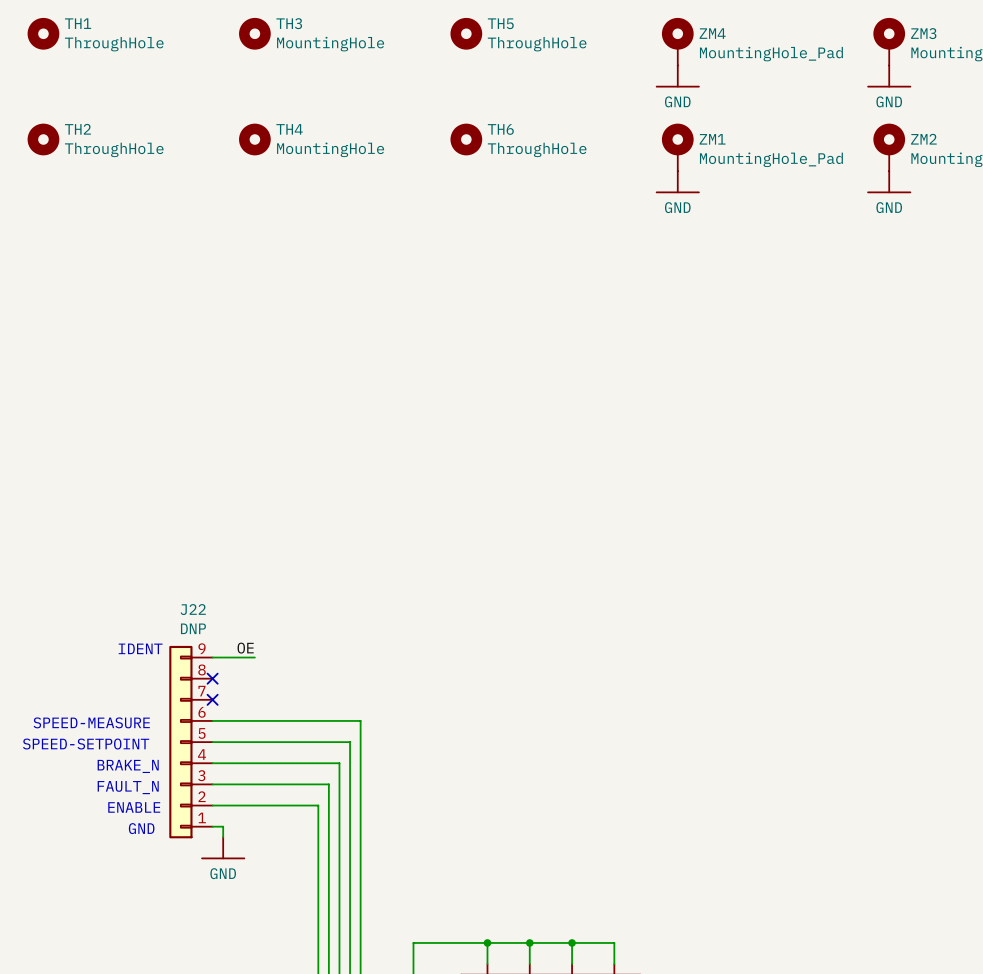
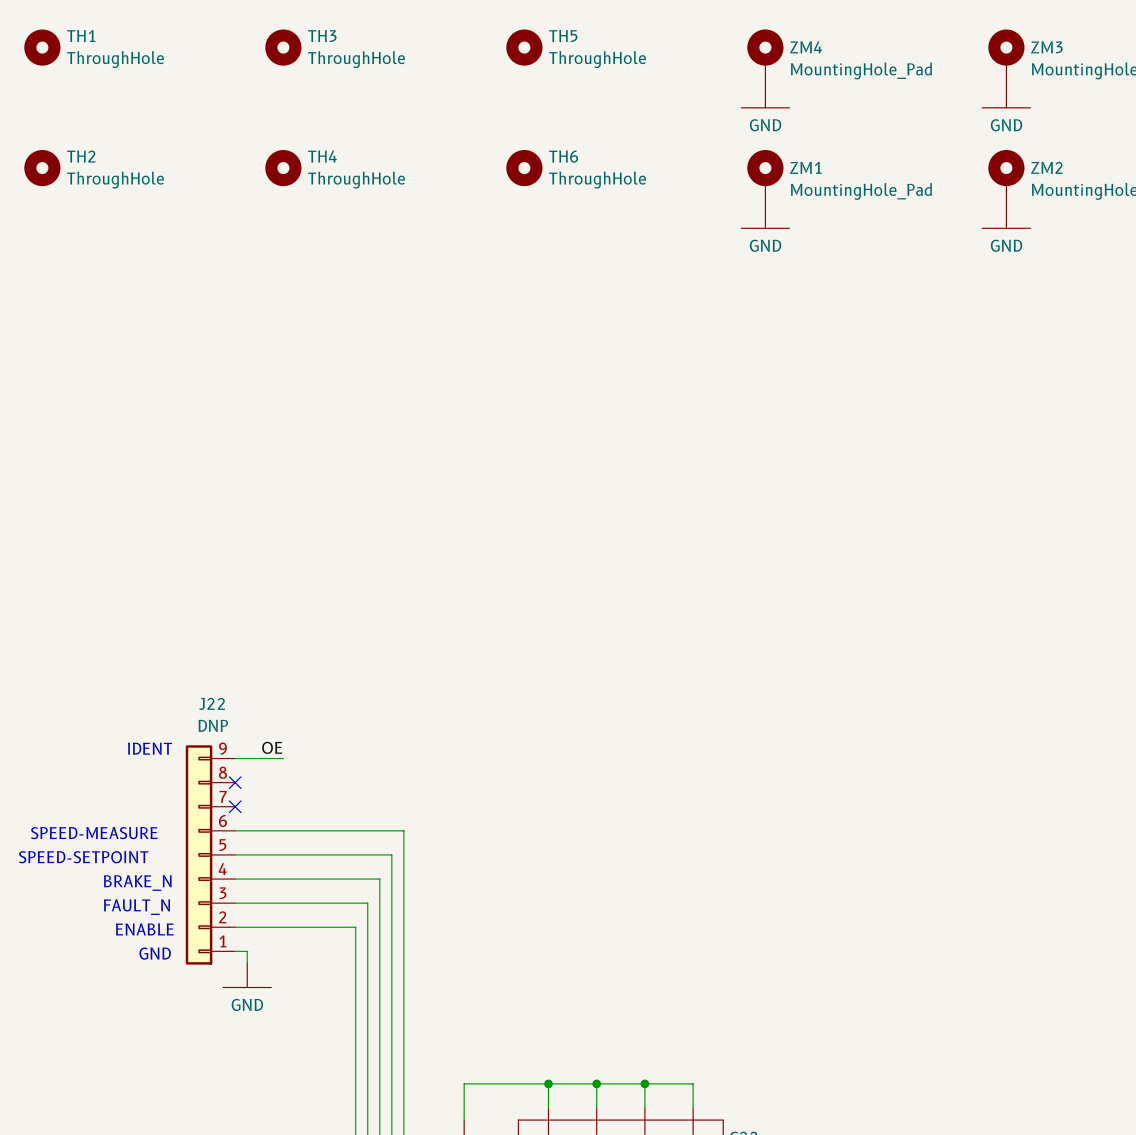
TH3 value: MountingHole (330, 44) -> ThroughHole (356, 59)
TH4 value: MountingHole (330, 149) -> ThroughHole (356, 180)

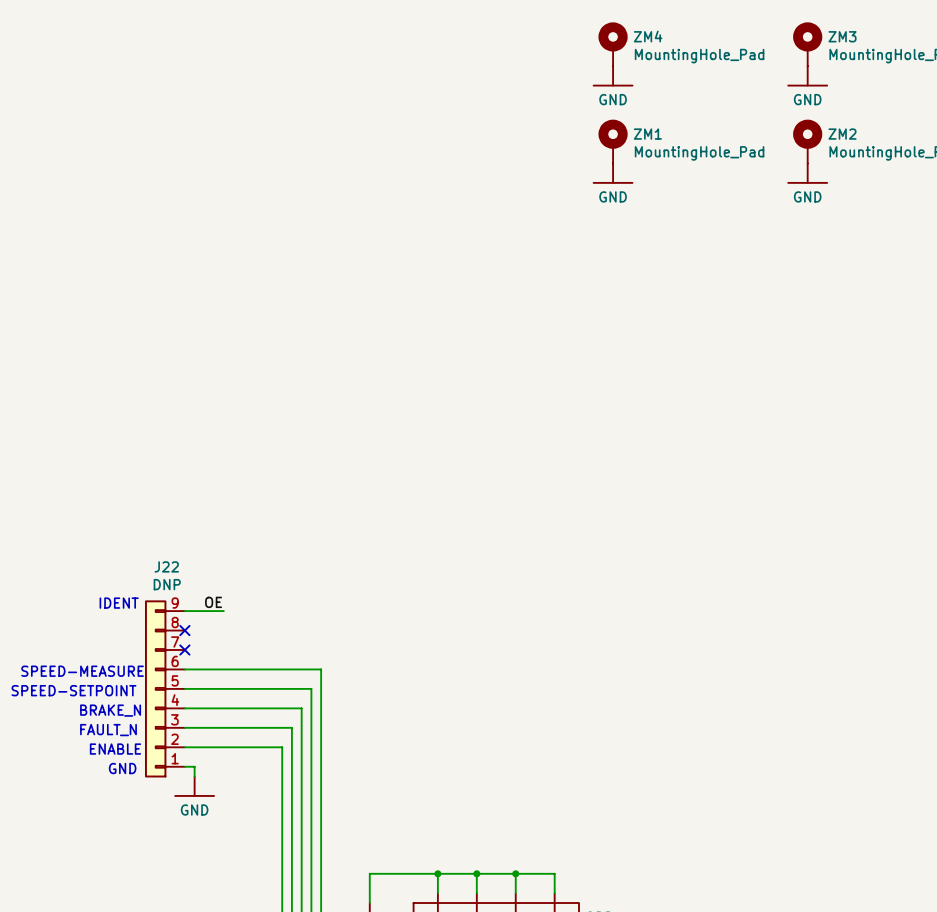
TH1: ThroughHole (42, 47) -> none
TH3: ThroughHole (283, 47) -> none
TH5: ThroughHole (524, 47) -> none
TH2: ThroughHole (42, 168) -> none
TH4: ThroughHole (283, 168) -> none
TH6: ThroughHole (524, 168) -> none

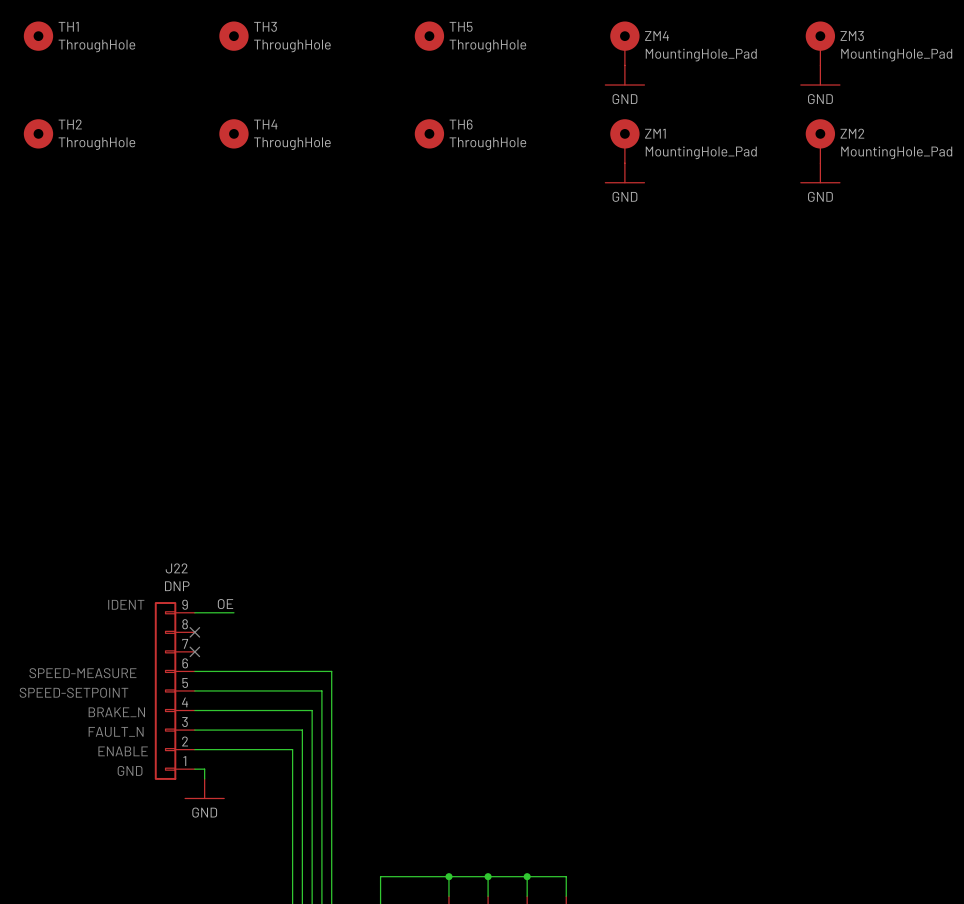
TH1: none -> ThroughHole (38, 36)
TH3: none -> ThroughHole (233, 36)
TH5: none -> ThroughHole (429, 36)
TH2: none -> ThroughHole (38, 133)
TH4: none -> ThroughHole (233, 133)
TH6: none -> ThroughHole (429, 133)

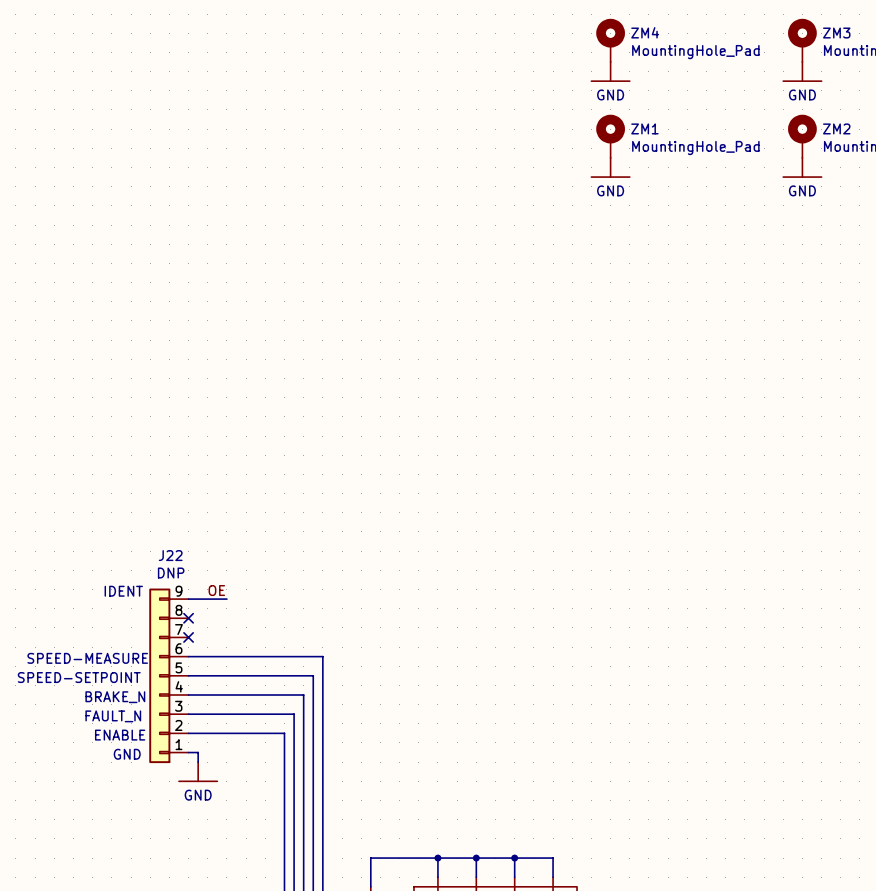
TH1: ThroughHole (38, 36) -> none
TH3: ThroughHole (233, 36) -> none
TH5: ThroughHole (429, 36) -> none
TH2: ThroughHole (38, 133) -> none
TH4: ThroughHole (233, 133) -> none
TH6: ThroughHole (429, 133) -> none

